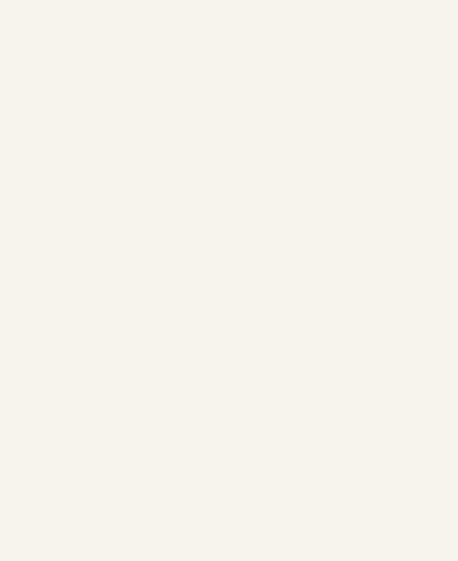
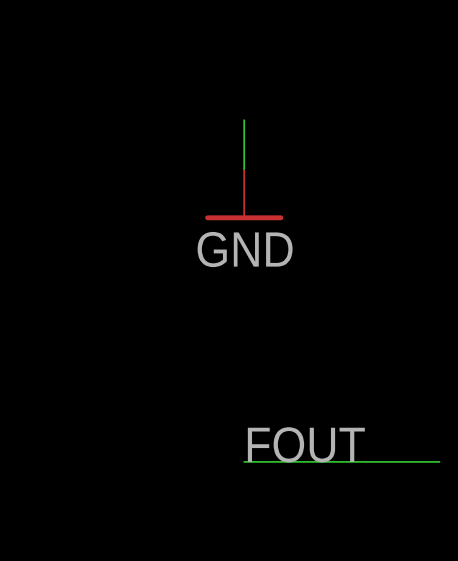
wire: none -> (244, 120) (244, 168)
power symbol: none -> GND (244, 194)
label: none -> FOUT (306, 444)
wire: none -> (244, 461) (439, 461)

